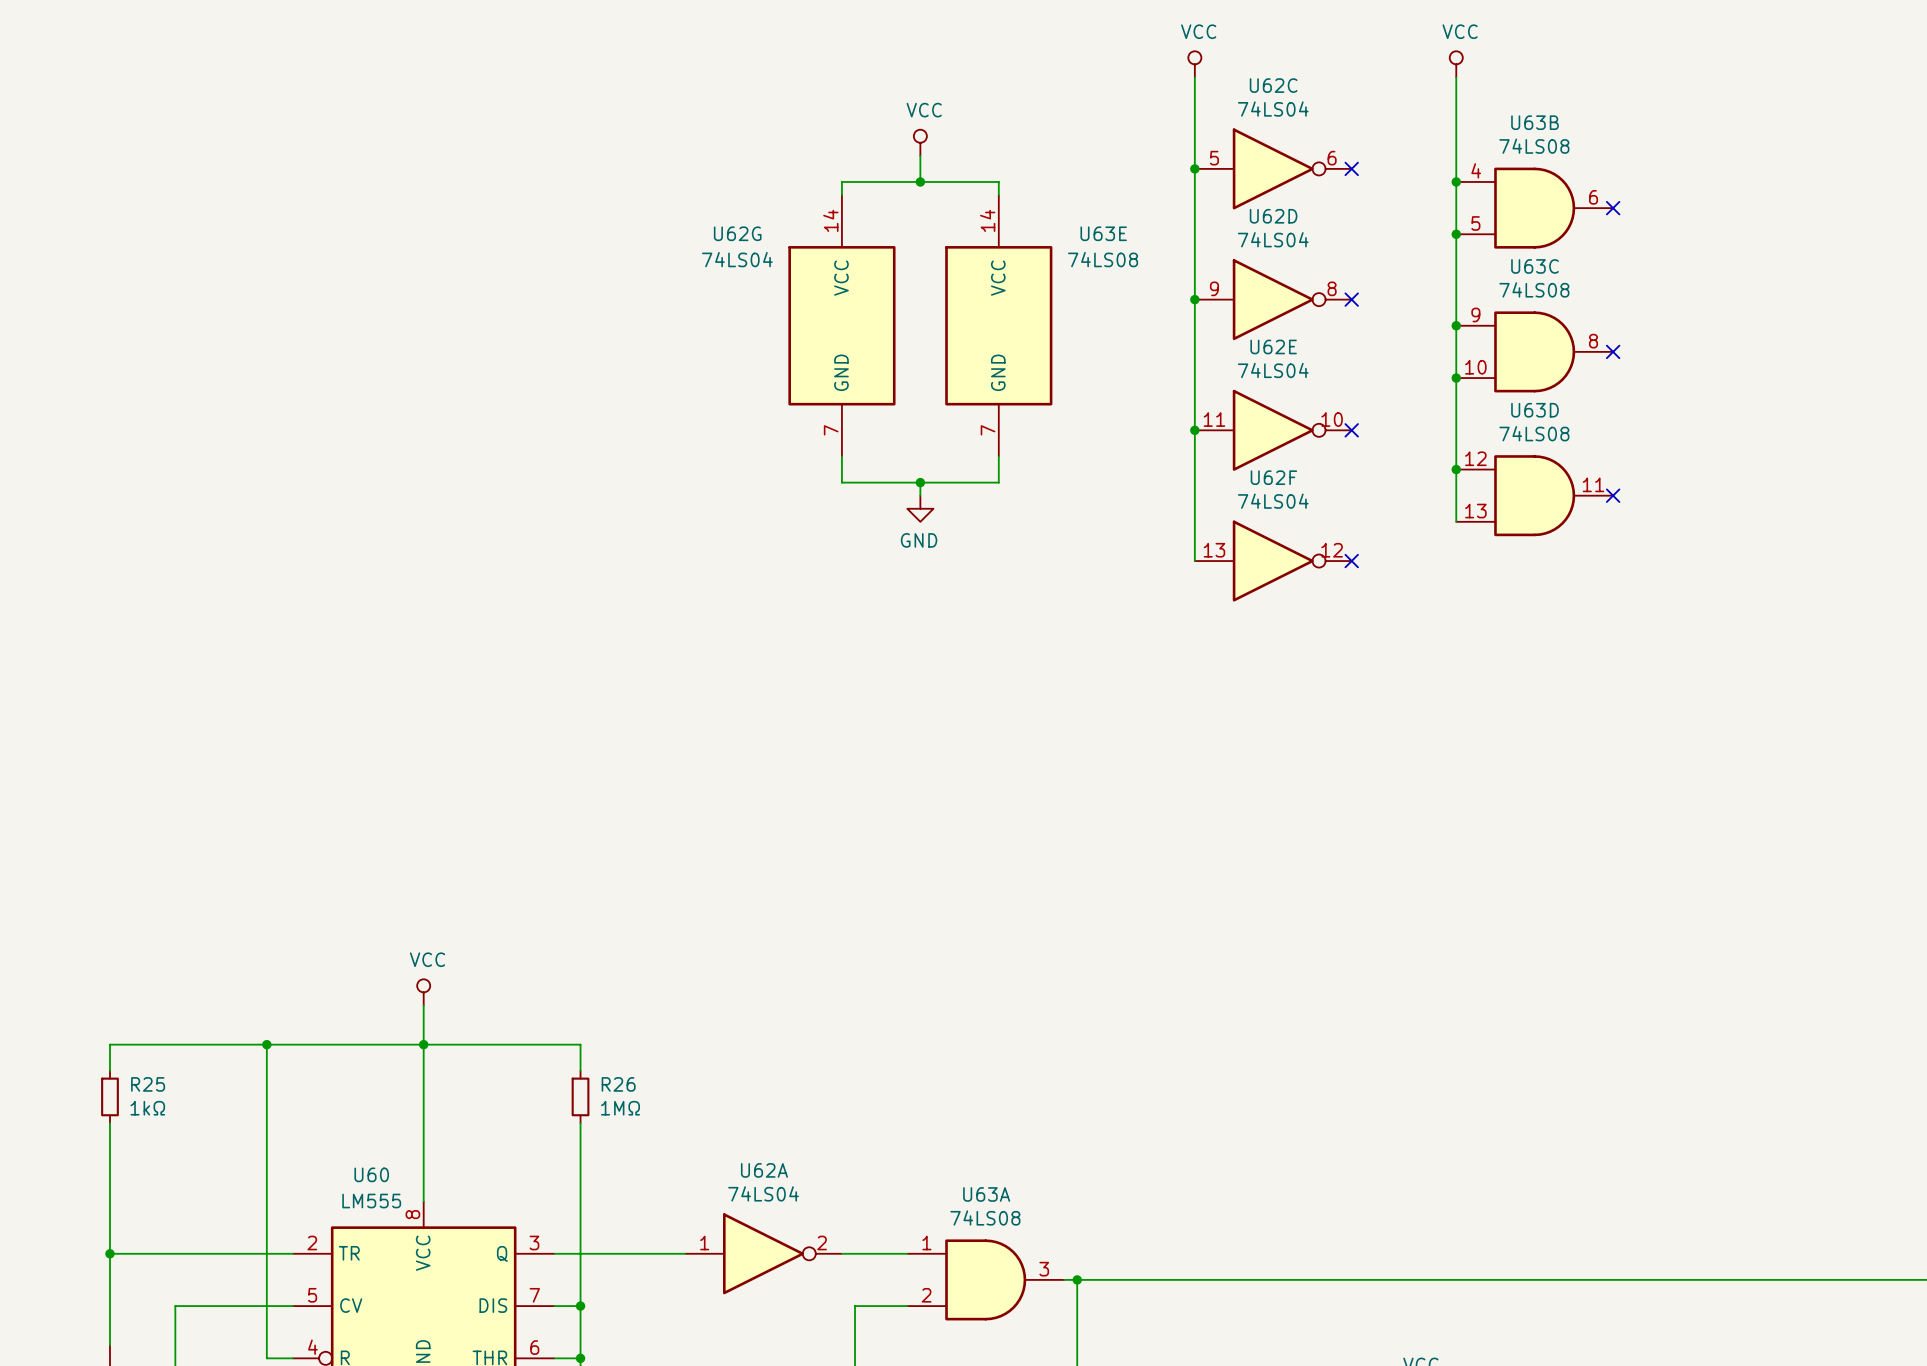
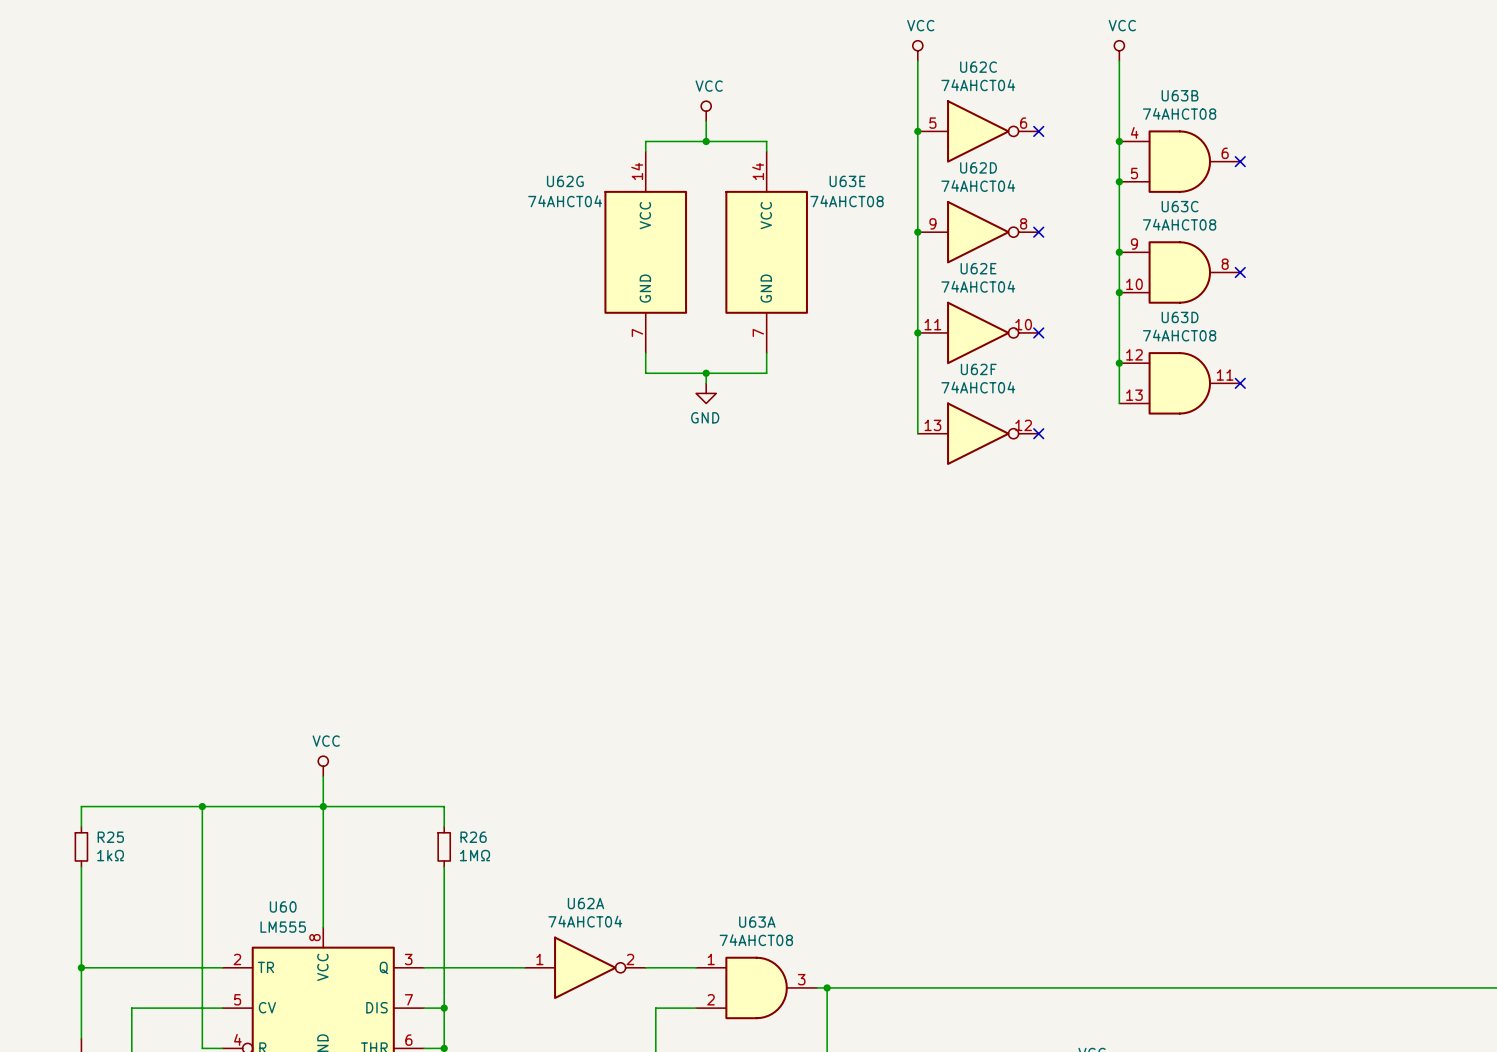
U62C value: 74LS04 (1273, 109) -> 74AHCT04 (978, 85)
U63B value: 74LS08 (1534, 146) -> 74AHCT08 (1179, 113)
U62D value: 74LS04 (1273, 239) -> 74AHCT04 (978, 186)
U62G value: 74LS04 (737, 259) -> 74AHCT04 (565, 201)
U63E value: 74LS08 (1103, 259) -> 74AHCT08 (847, 201)
U63C value: 74LS08 (1534, 289) -> 74AHCT08 (1179, 224)
U62E value: 74LS04 (1273, 370) -> 74AHCT04 (978, 286)
U63D value: 74LS08 (1534, 433) -> 74AHCT08 (1179, 335)
U62F value: 74LS04 (1273, 501) -> 74AHCT04 (978, 387)
U62A value: 74LS04 (763, 1193) -> 74AHCT04 (585, 921)
U63A value: 74LS08 (985, 1217) -> 74AHCT08 (756, 940)

